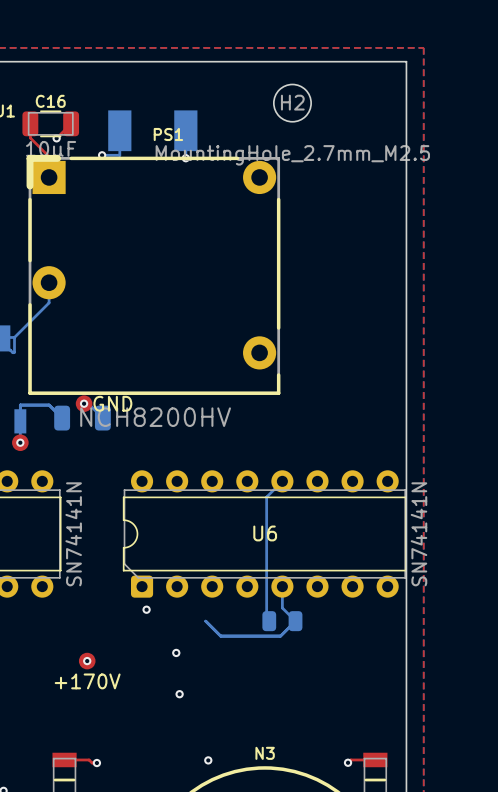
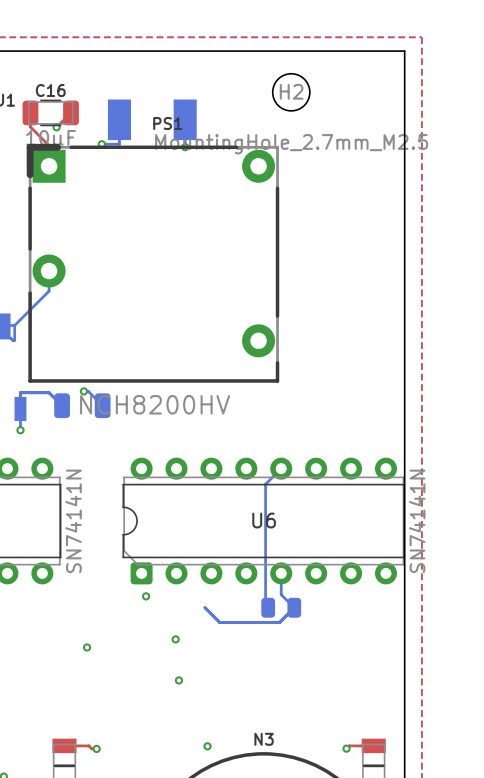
part: (84, 403) -> none
text: GND (112, 403) -> none
part: (20, 442) -> none
part: (87, 661) -> none
text: +170V (87, 681) -> none

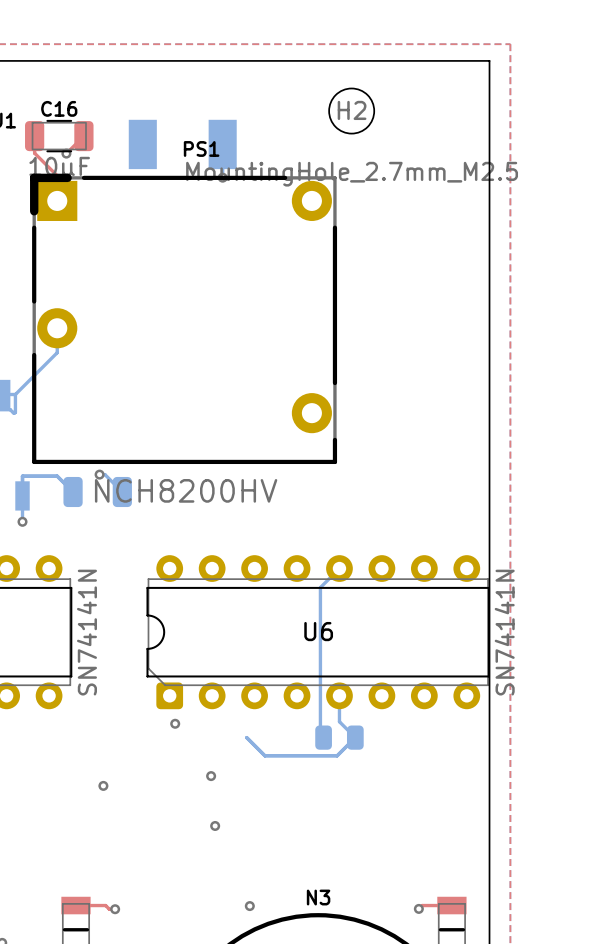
bottom track: (119, 119) (119, 144) (101, 144) -> none
via: (101, 144) -> none

